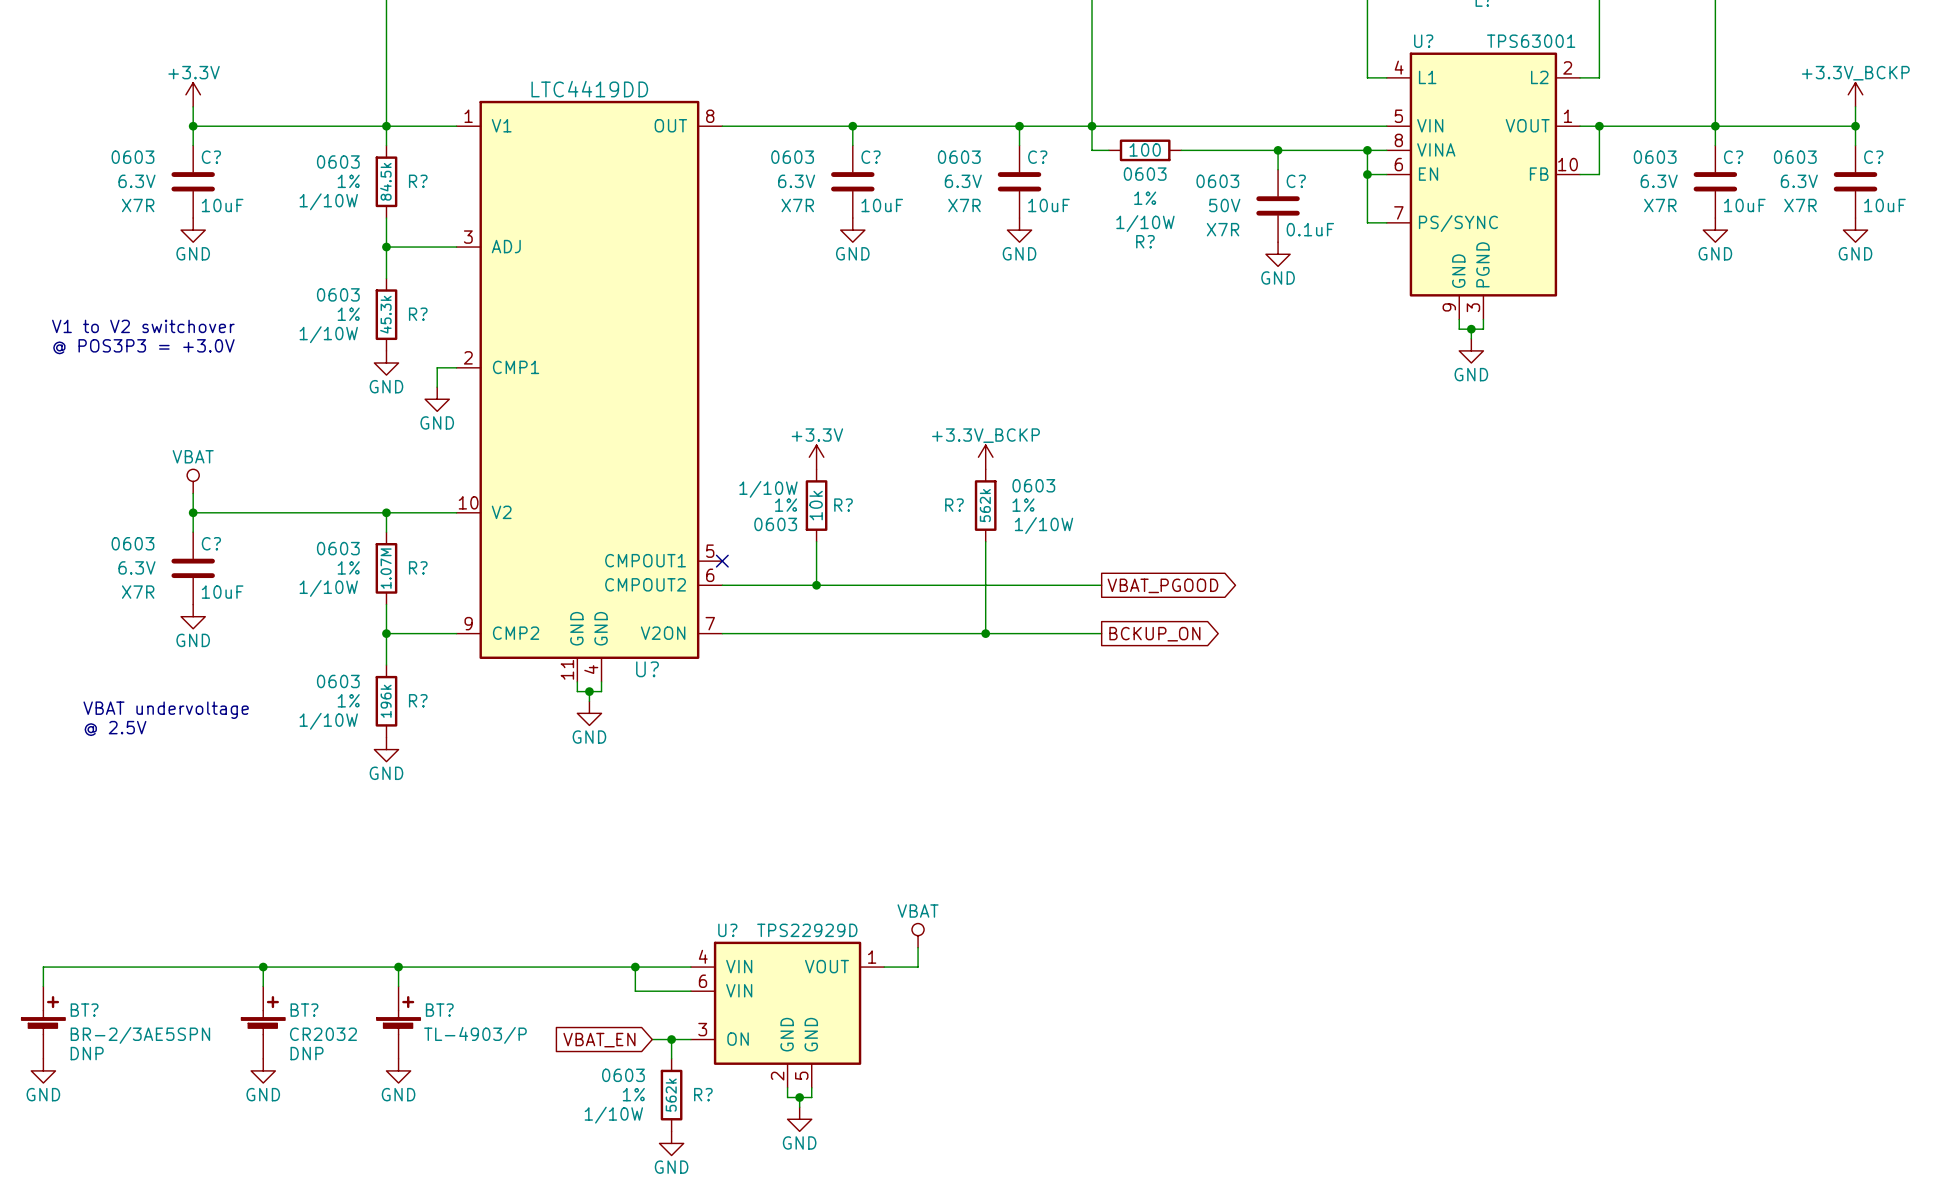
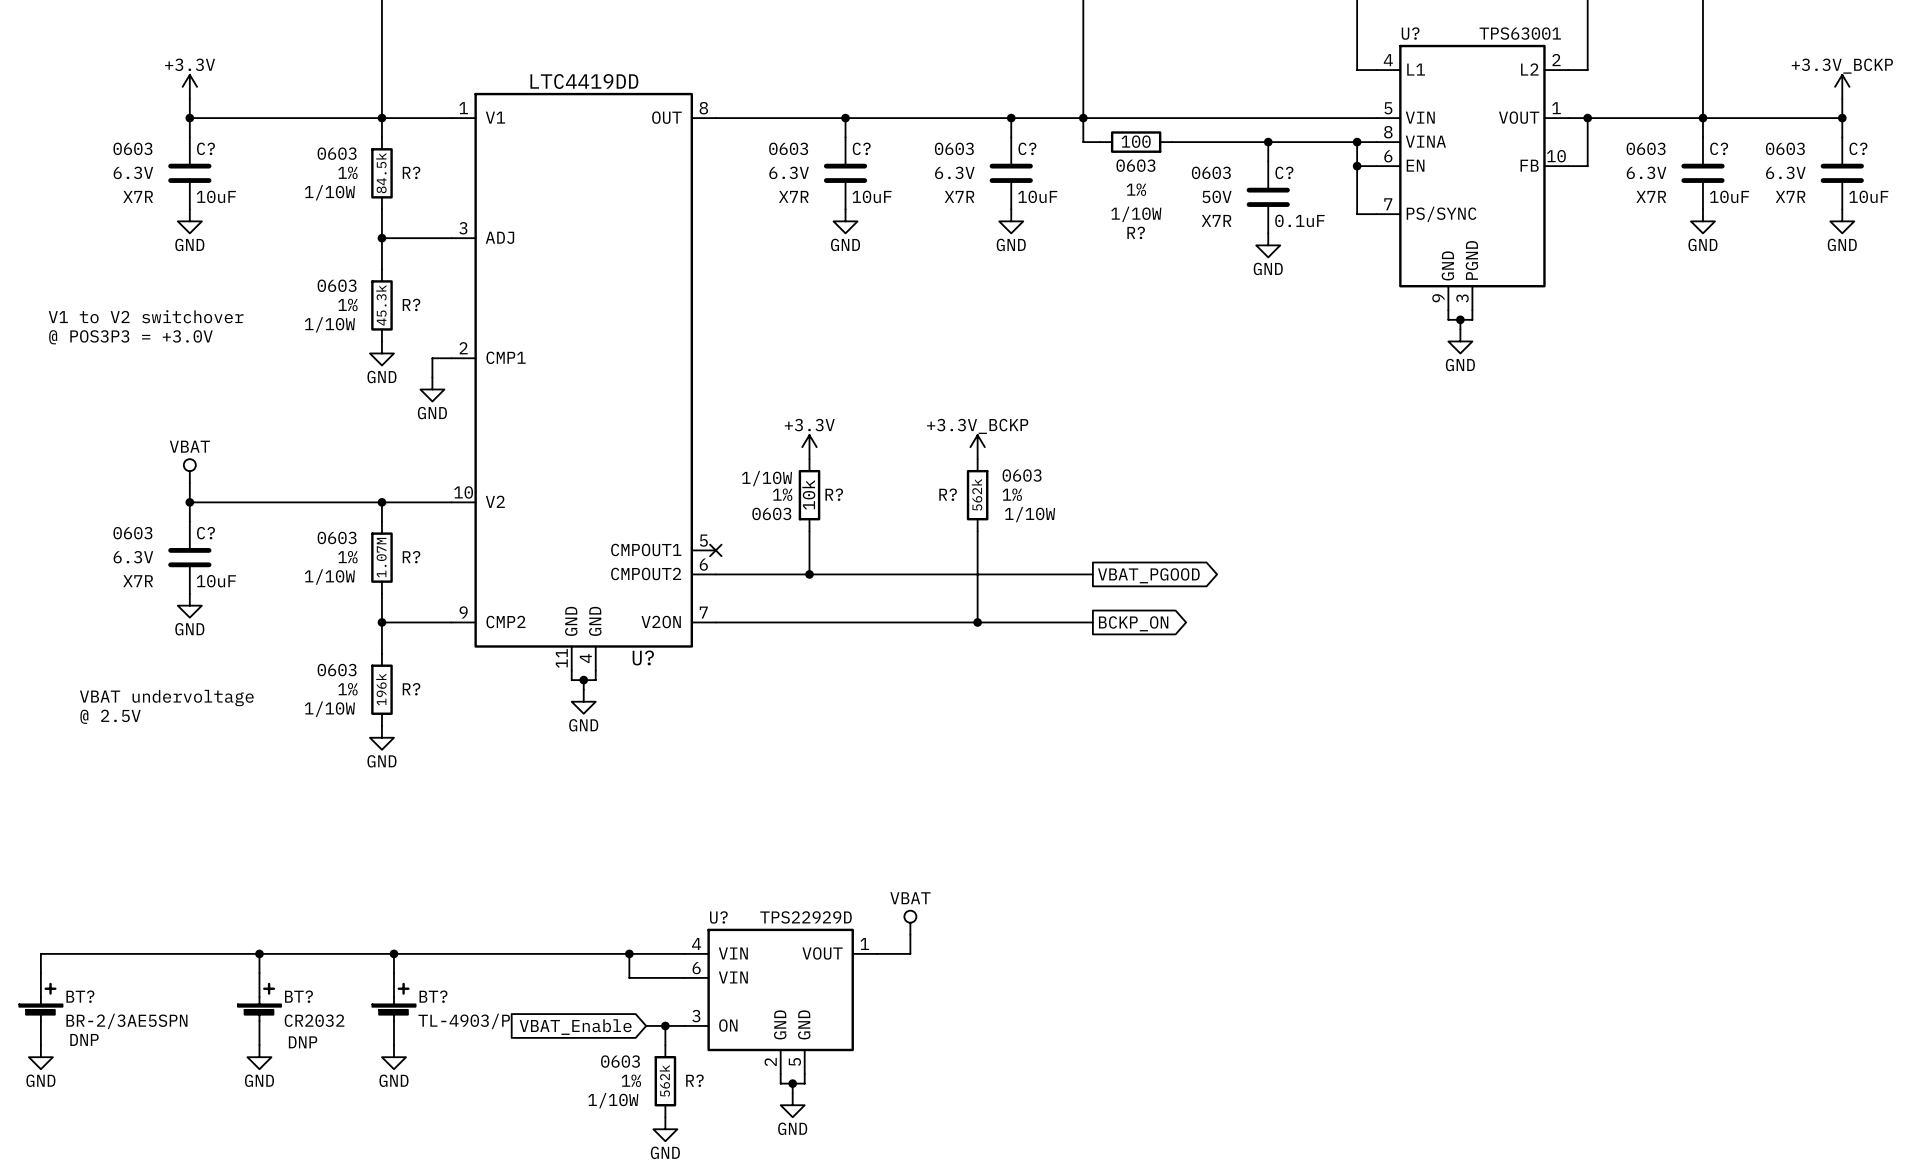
global label: BCKUP_ON (1154, 634) -> BCKP_ON (1133, 623)
global label: VBAT_EN (599, 1040) -> VBAT_Enable (575, 1027)
BT? text: DNP (307, 1053) -> none
BT? text: none -> DNP (303, 1042)

